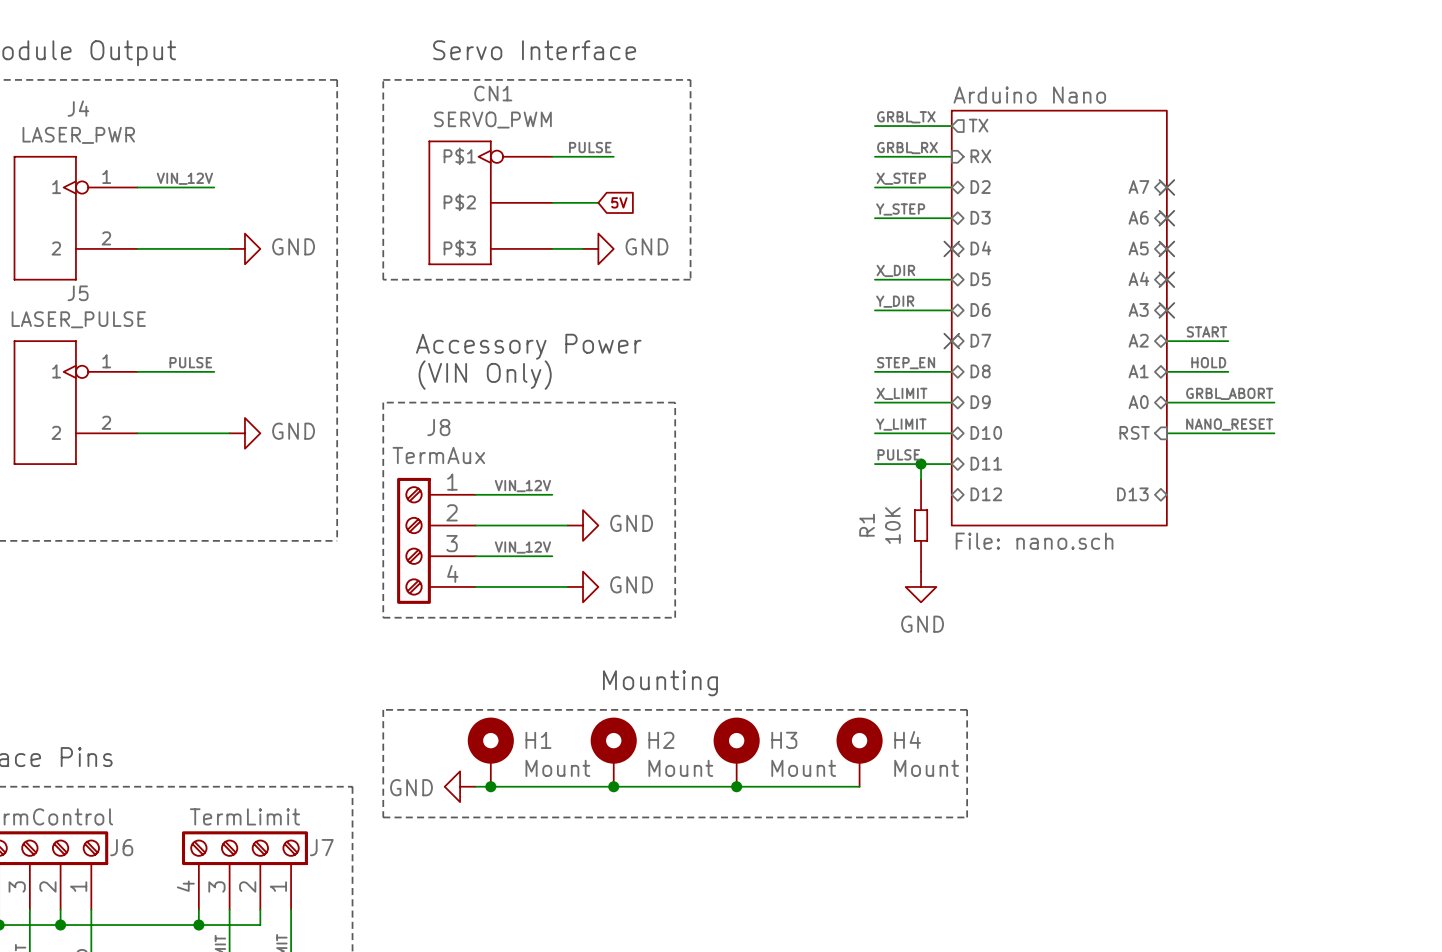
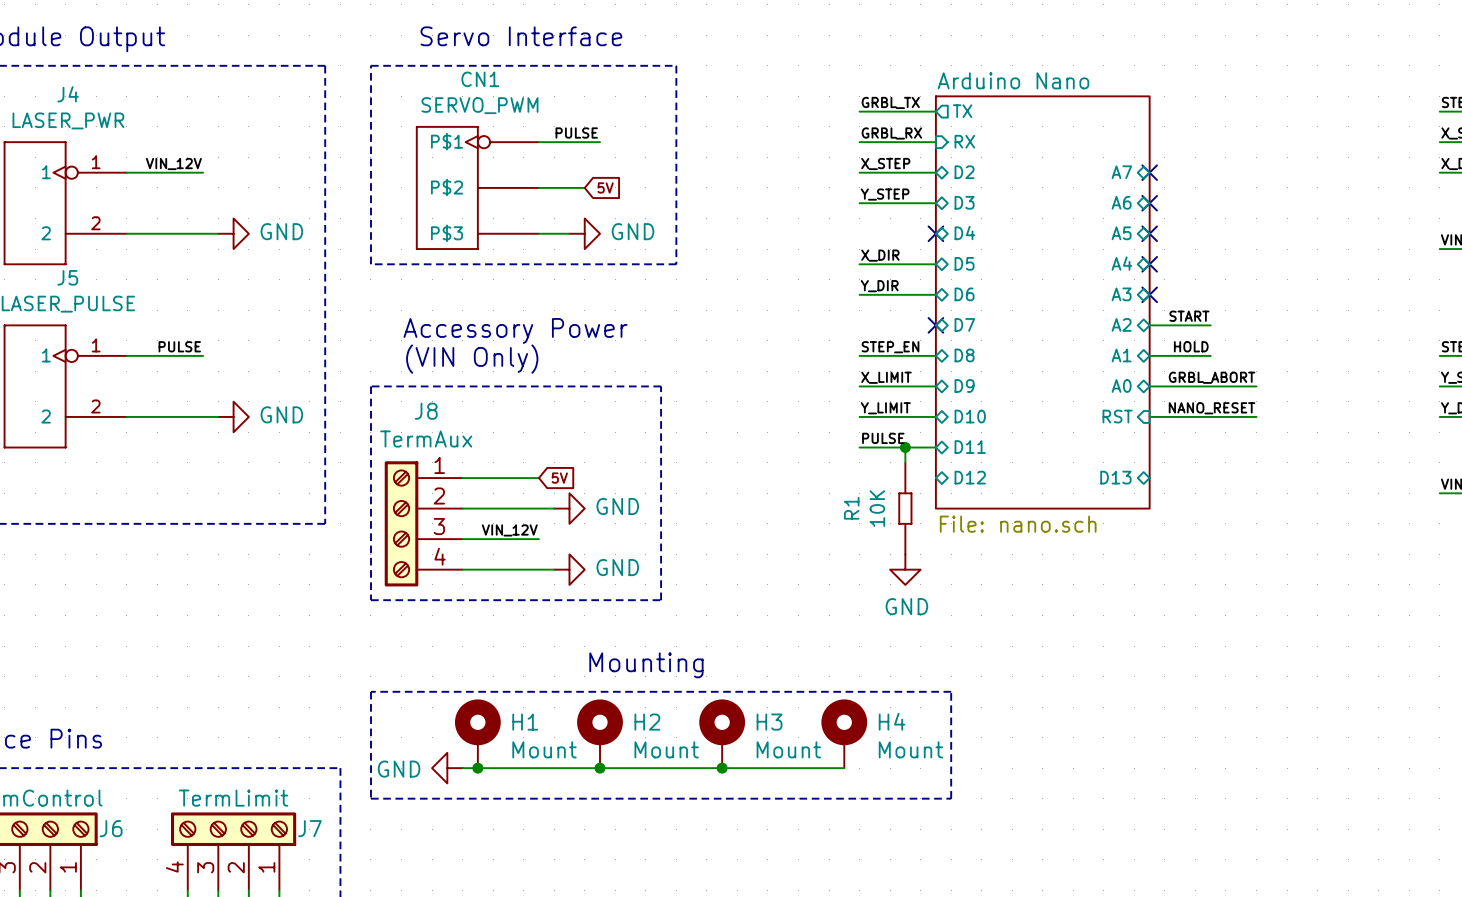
label: VIN_12V (522, 486) -> none
global label: none -> 5V (559, 478)

